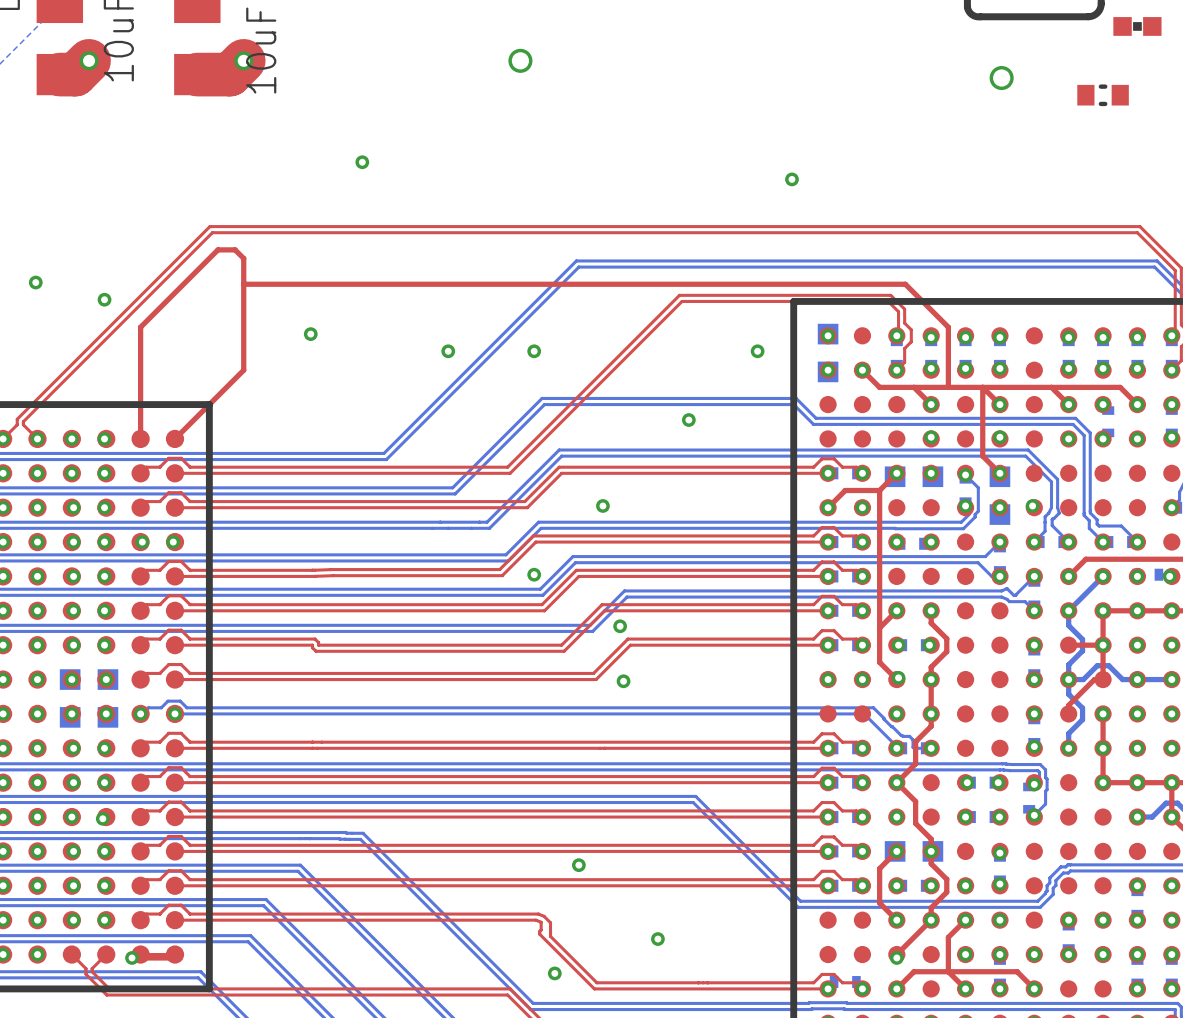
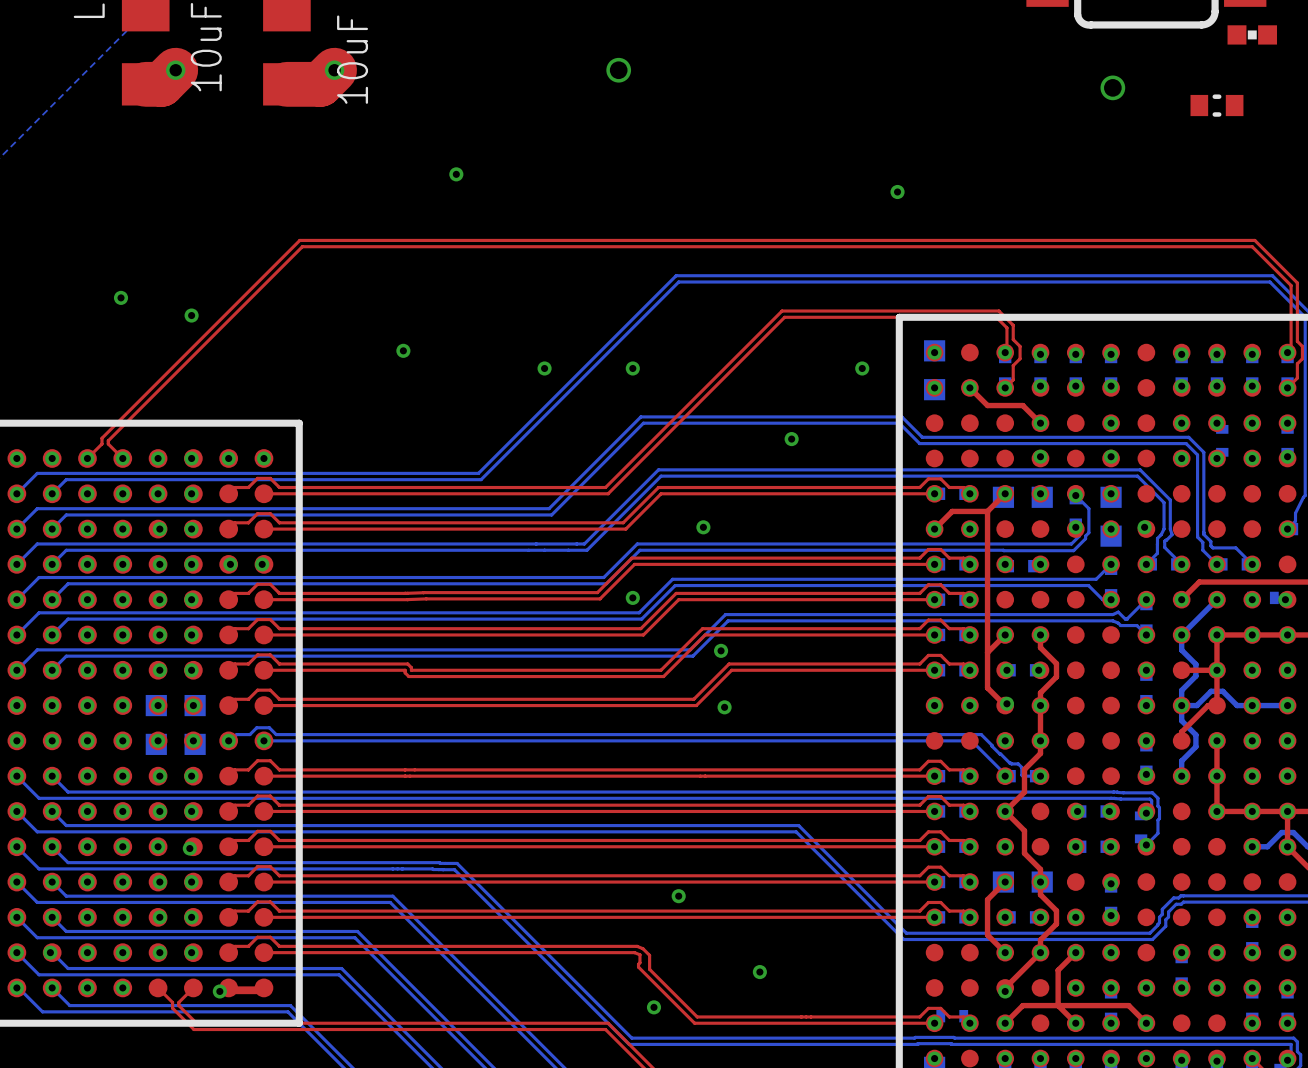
top track: (243, 284) (905, 284) (948, 327) (948, 387) -> none
top track: (914, 387) (1120, 387) (1137, 404) -> none
top track: (1051, 387) (1068, 404) -> none
top track: (999, 404) (982, 387) (982, 456) (999, 473) -> none
top track: (140, 438) (140, 327) (217, 249) (235, 249) (243, 258) (243, 370) (174, 438) -> none
via: none -> (228, 458)
via: none -> (263, 458)

